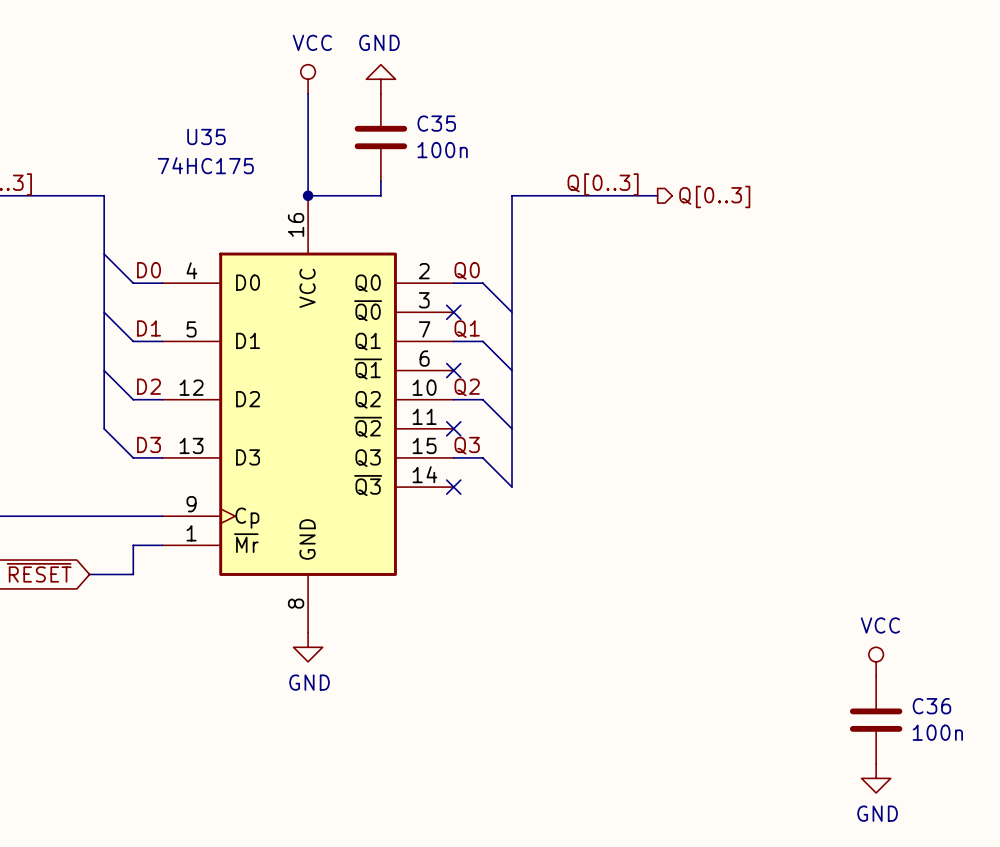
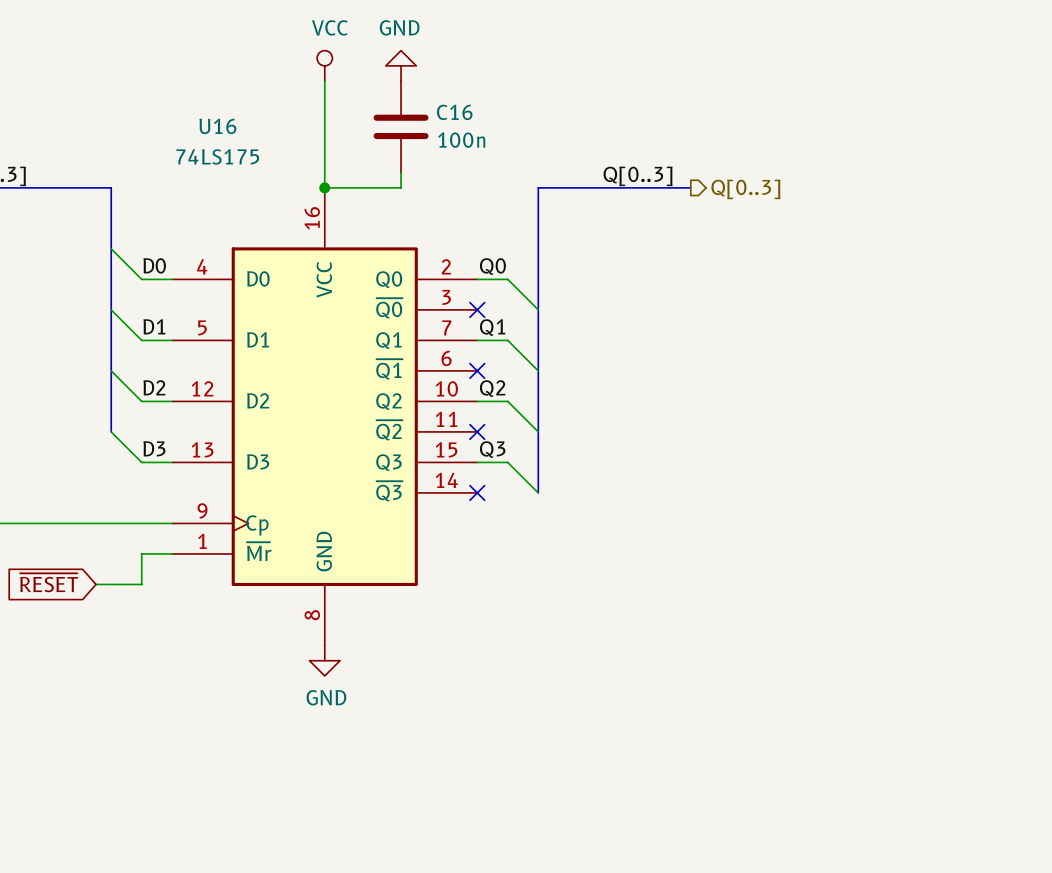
C35 name: C35 (436, 123) -> C16 (454, 112)
U35 name: U35 (206, 136) -> U16 (217, 126)
U35 value: 74HC175 (205, 165) -> 74LS175 (217, 156)
power symbol: VCC (876, 661) -> none
C36: 100n (876, 720) -> none
power symbol: GND (876, 778) -> none

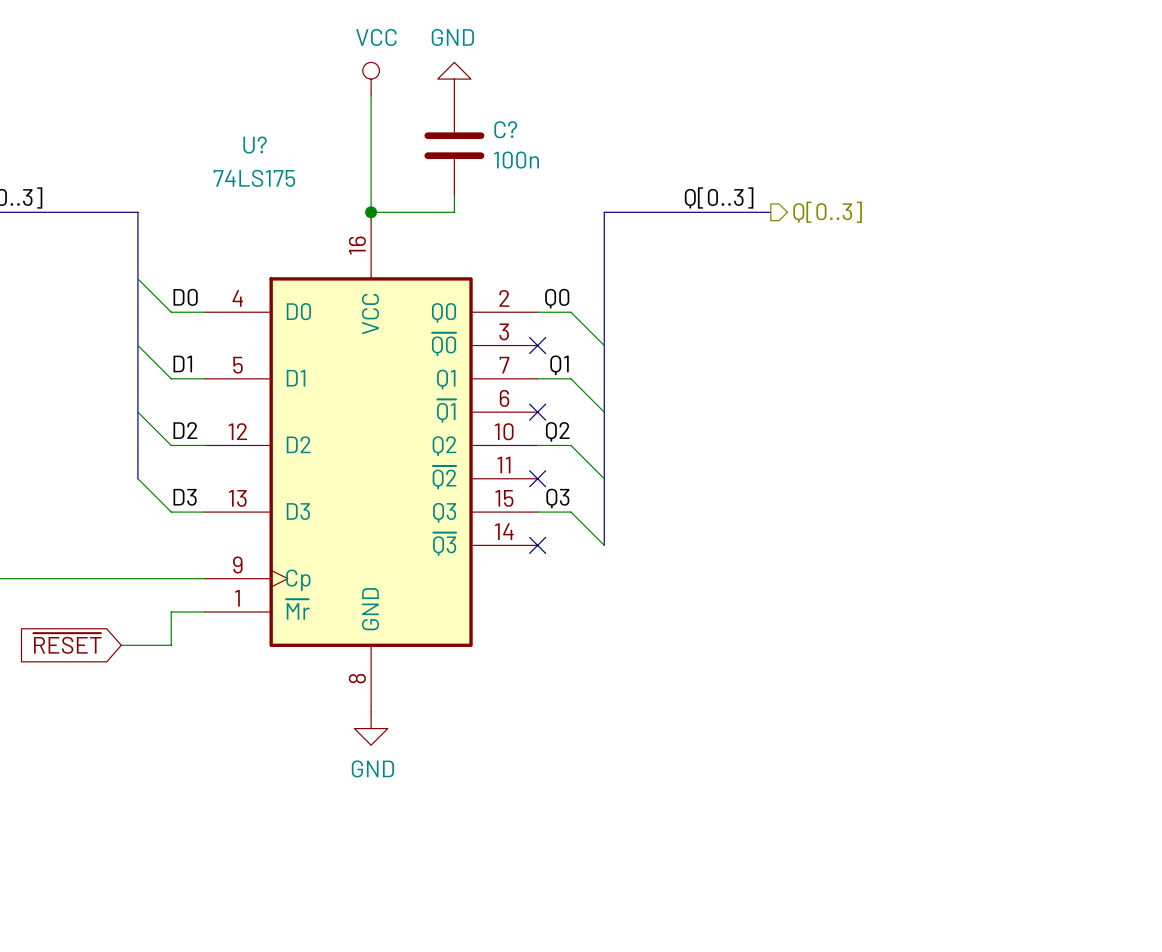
C16 name: C16 (454, 112) -> C? (505, 129)
U16 name: U16 (217, 126) -> U? (255, 145)

